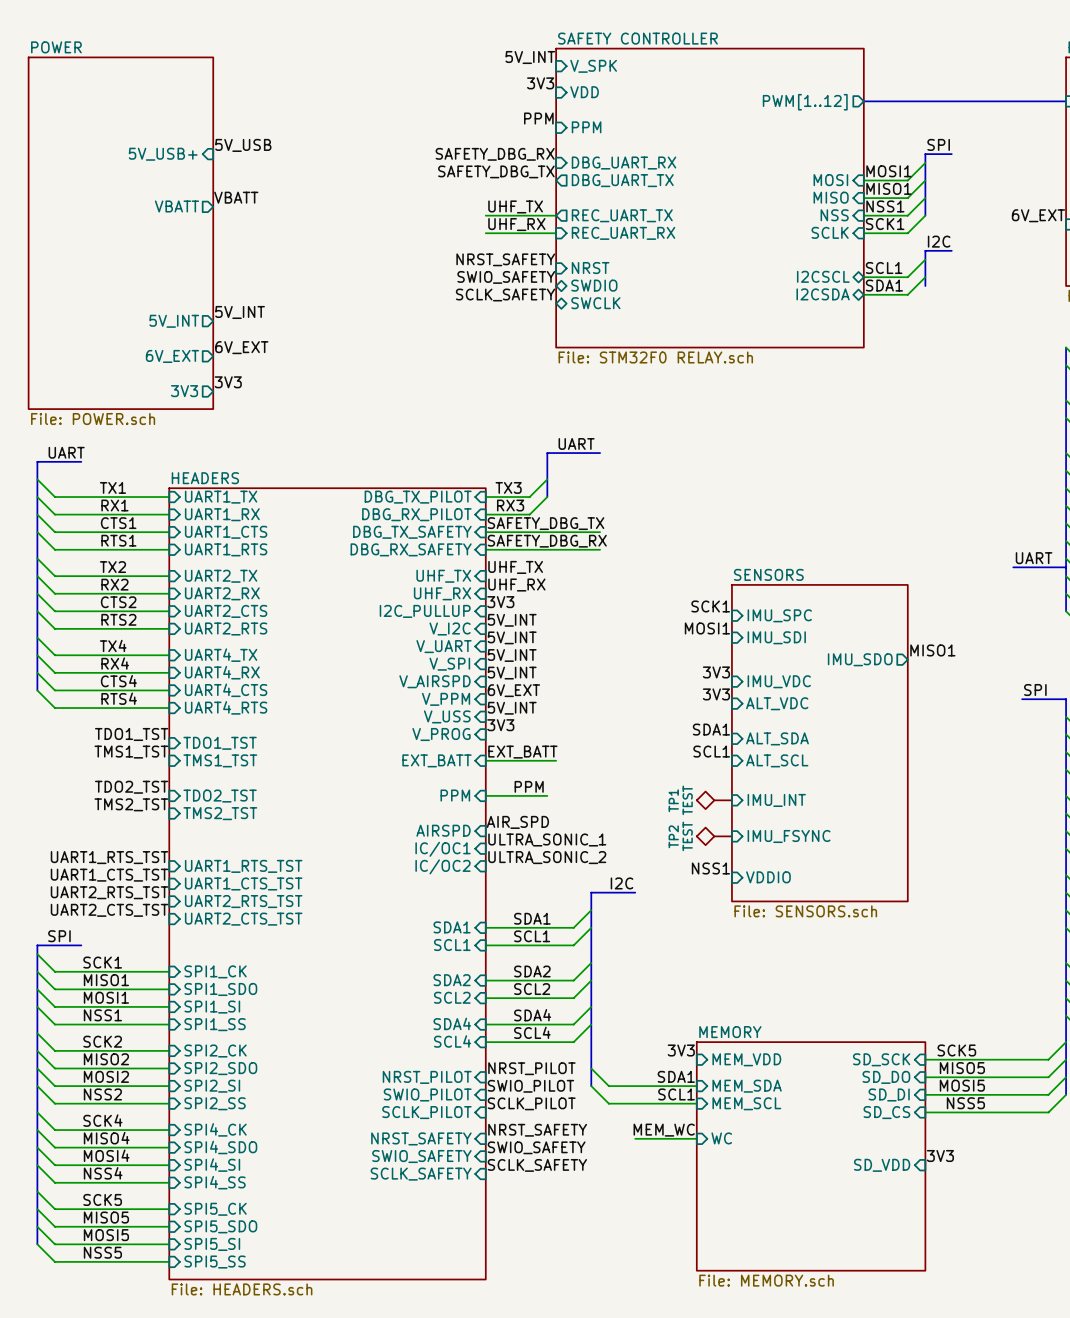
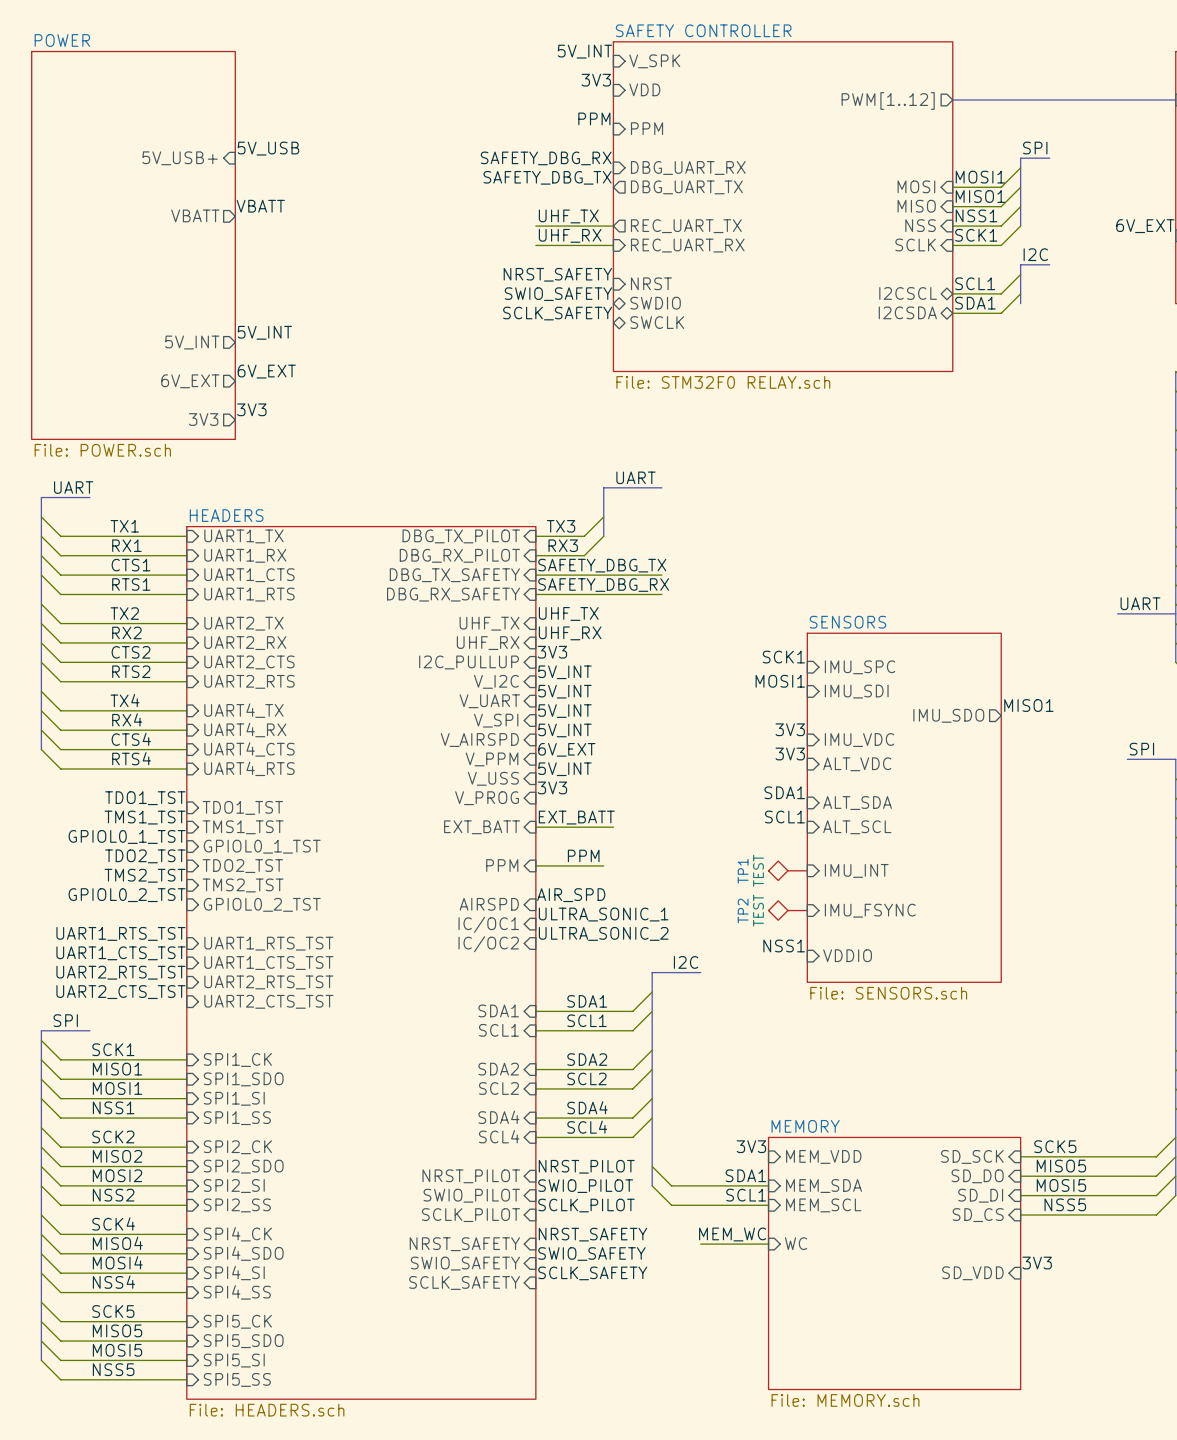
label: none -> GPIOL0_1_TST (127, 836)
sheet pin: none -> GPIOL0_1_TST (262, 846)
label: none -> GPIOL0_2_TST (127, 895)
sheet pin: none -> GPIOL0_2_TST (262, 904)

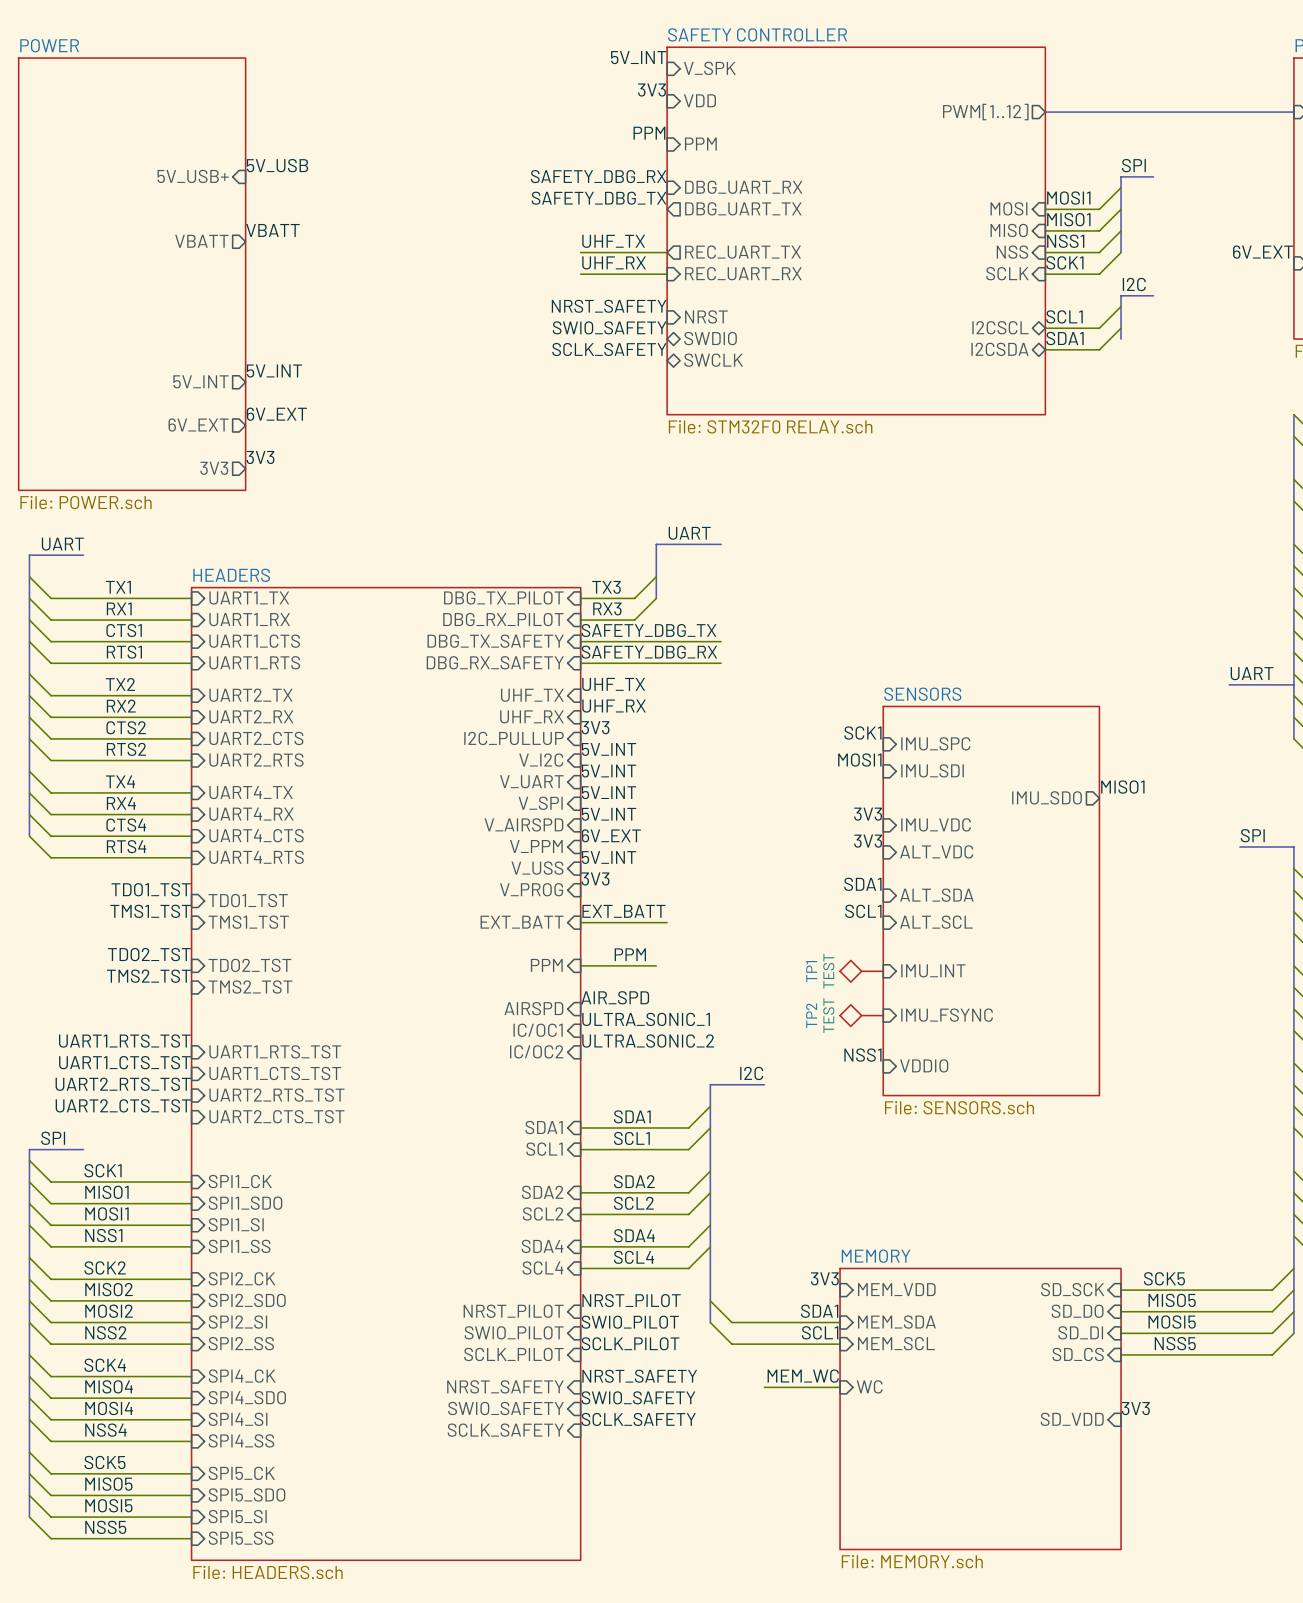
label: GPIOL0_1_TST (127, 836) -> none
sheet pin: GPIOL0_1_TST (262, 846) -> none
label: GPIOL0_2_TST (127, 895) -> none
sheet pin: GPIOL0_2_TST (262, 904) -> none

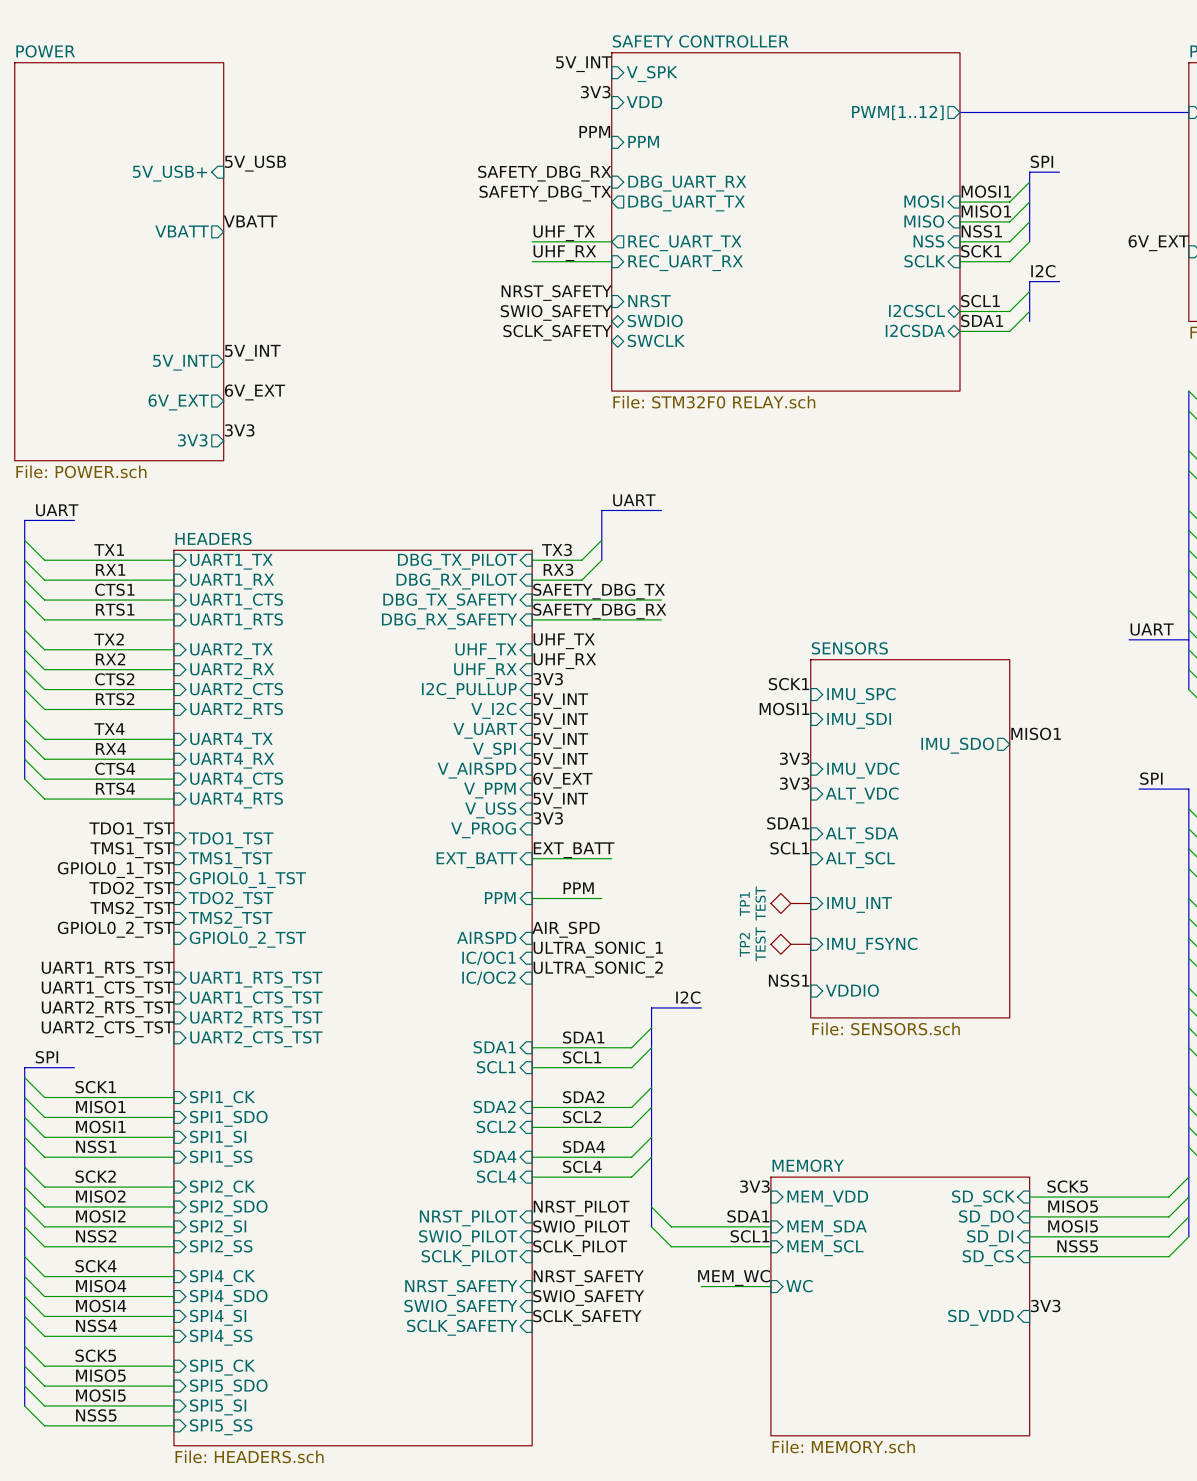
label: none -> GPIOL0_1_TST (115, 870)
sheet pin: none -> GPIOL0_1_TST (247, 880)
label: none -> GPIOL0_2_TST (115, 929)
sheet pin: none -> GPIOL0_2_TST (247, 939)

